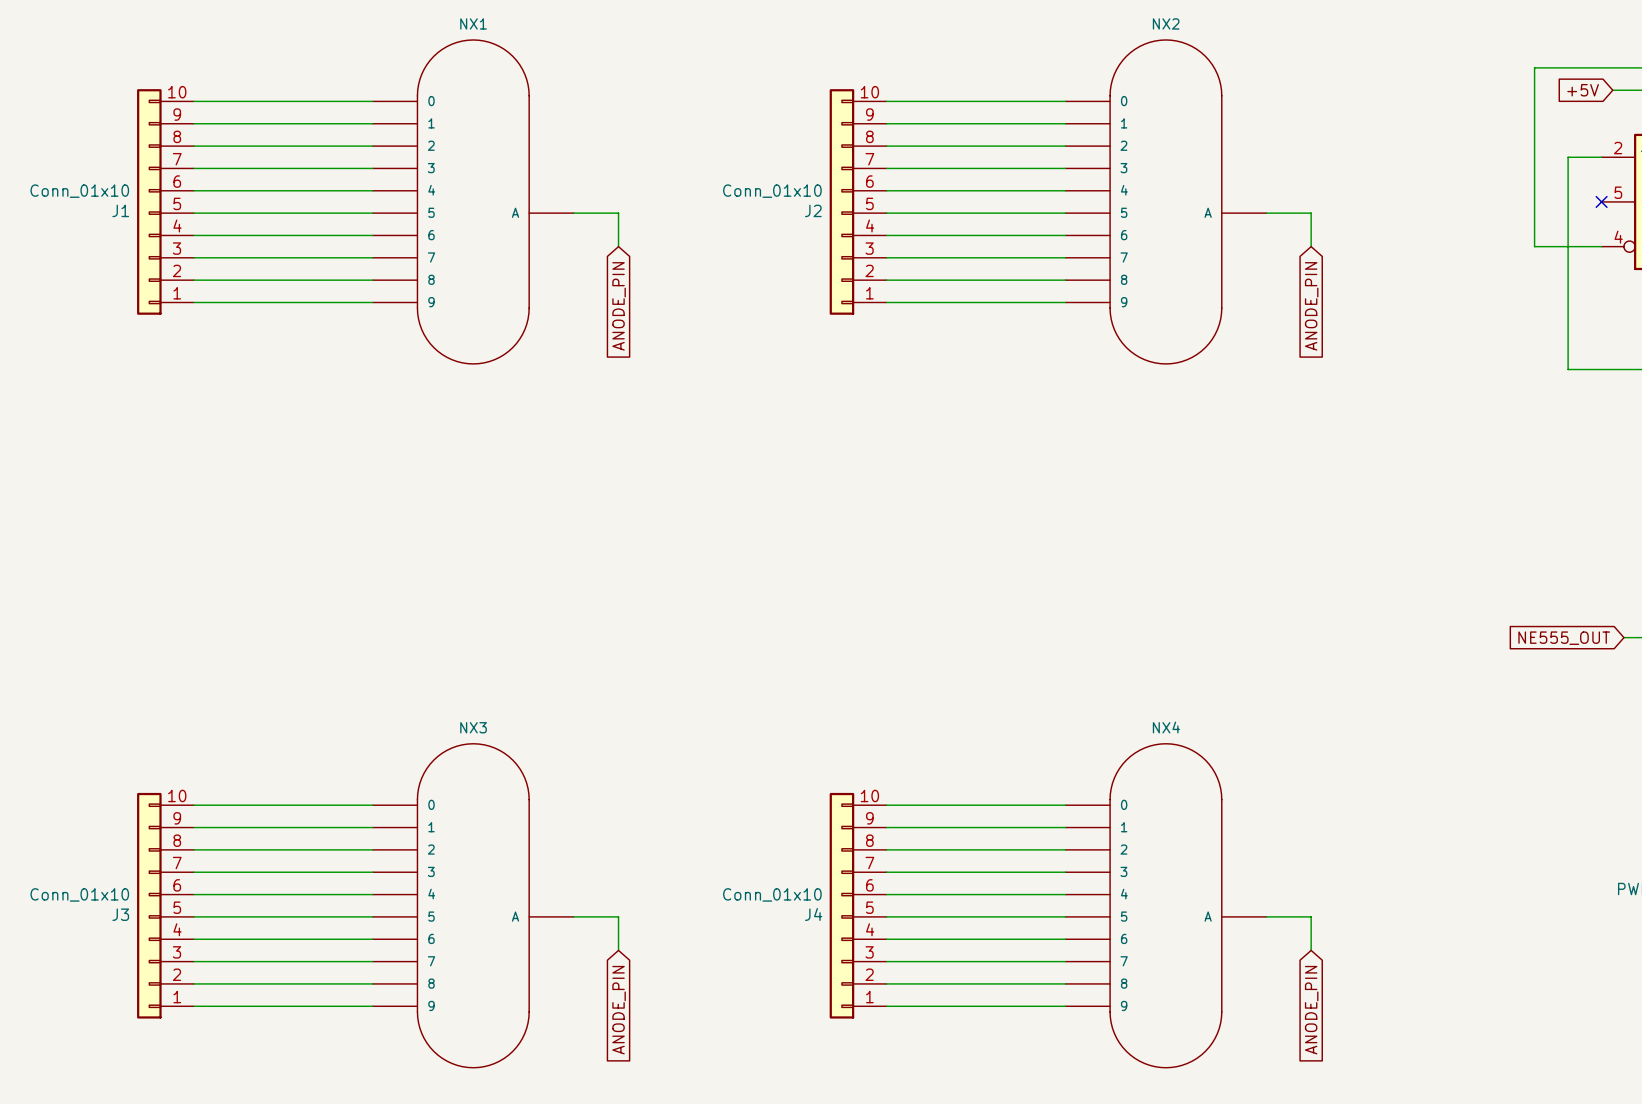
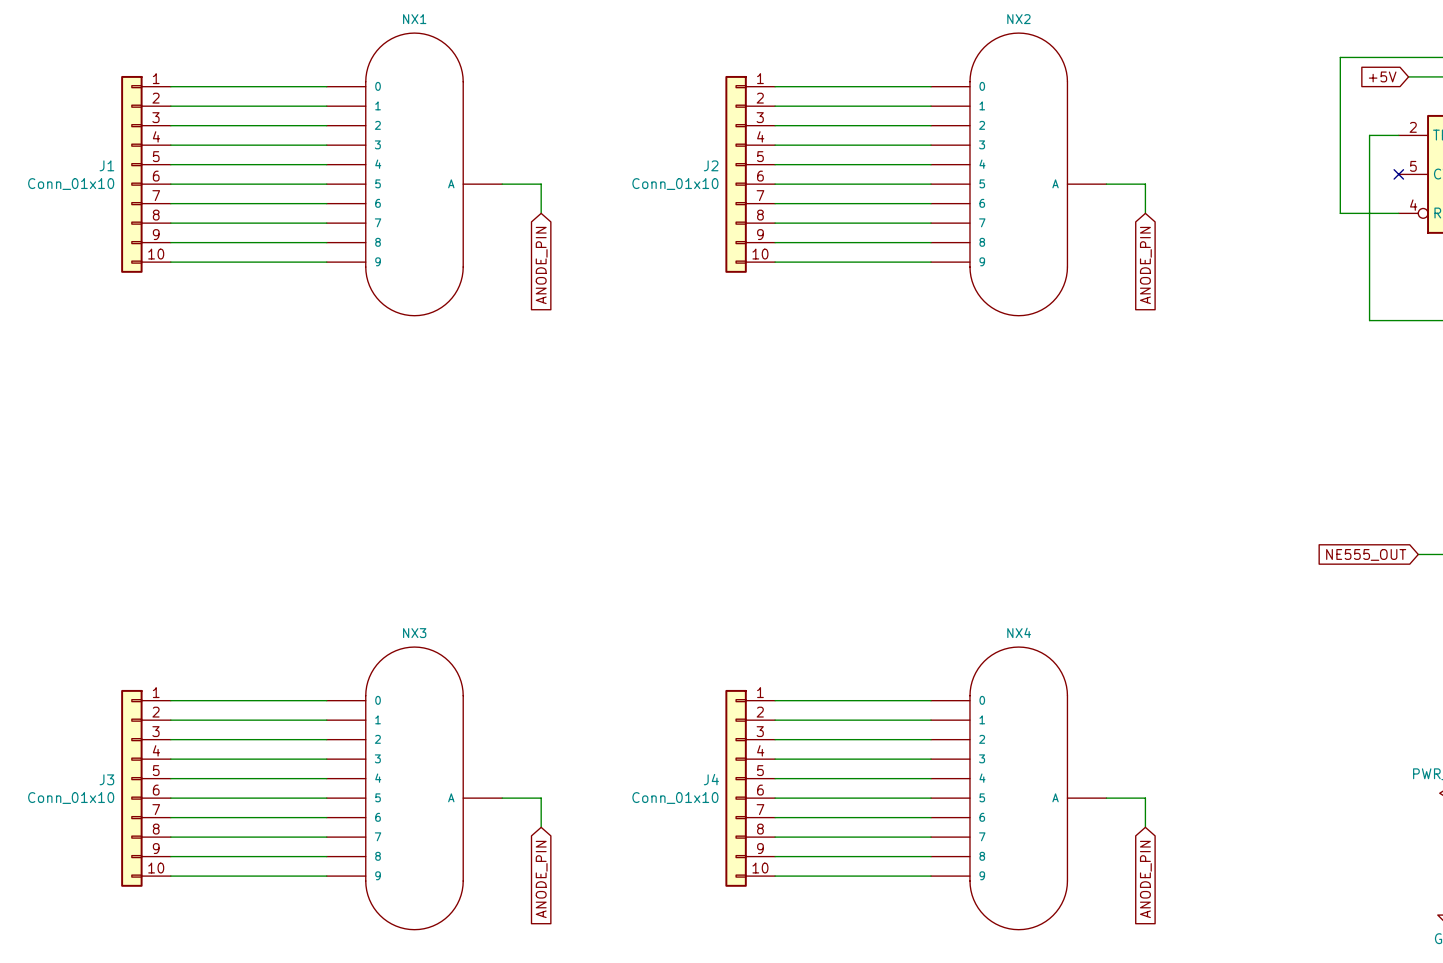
J1 flip: as is (149, 201) -> up-down (131, 174)
J2 flip: as is (841, 201) -> up-down (736, 174)
J3 flip: as is (149, 905) -> up-down (131, 788)
J4 flip: as is (841, 905) -> up-down (736, 788)

